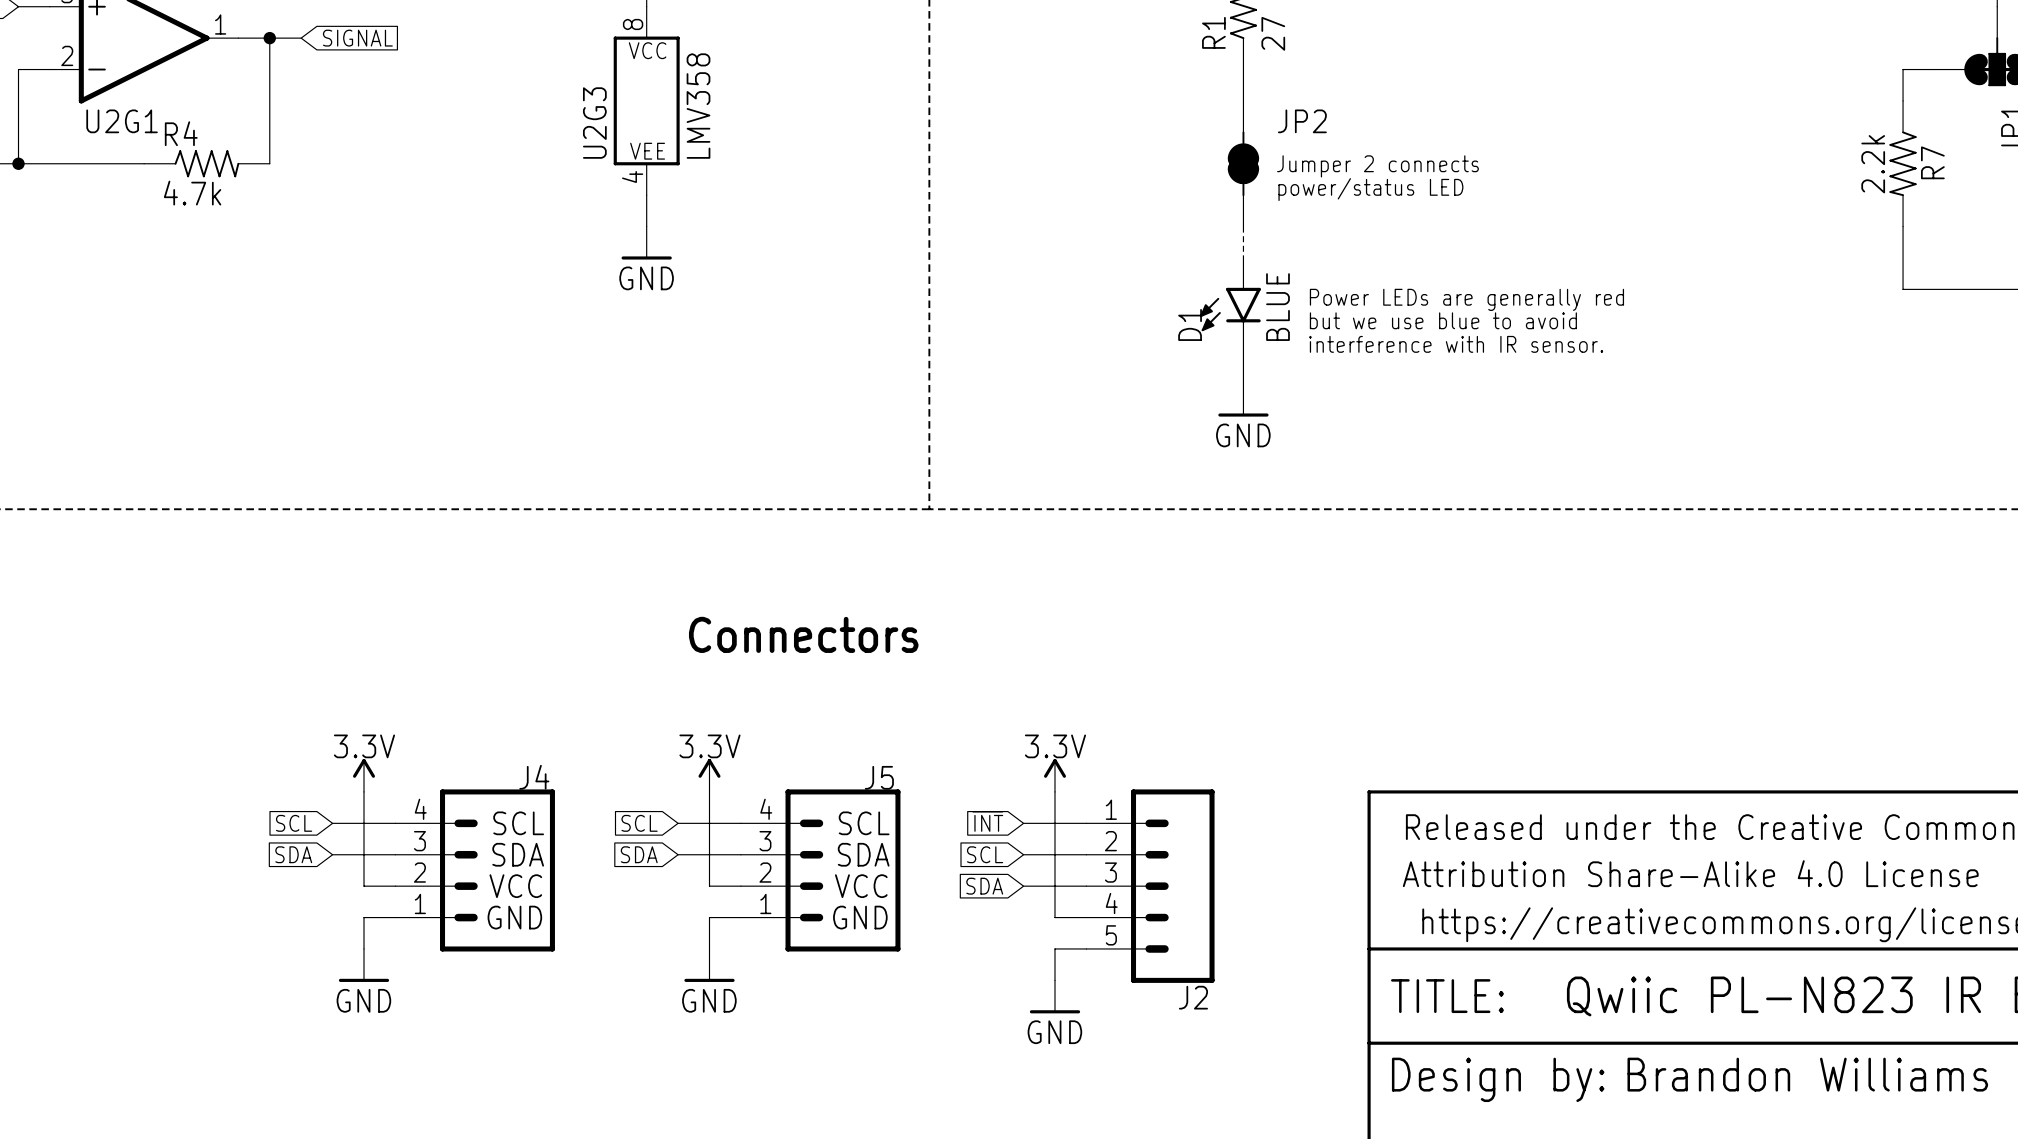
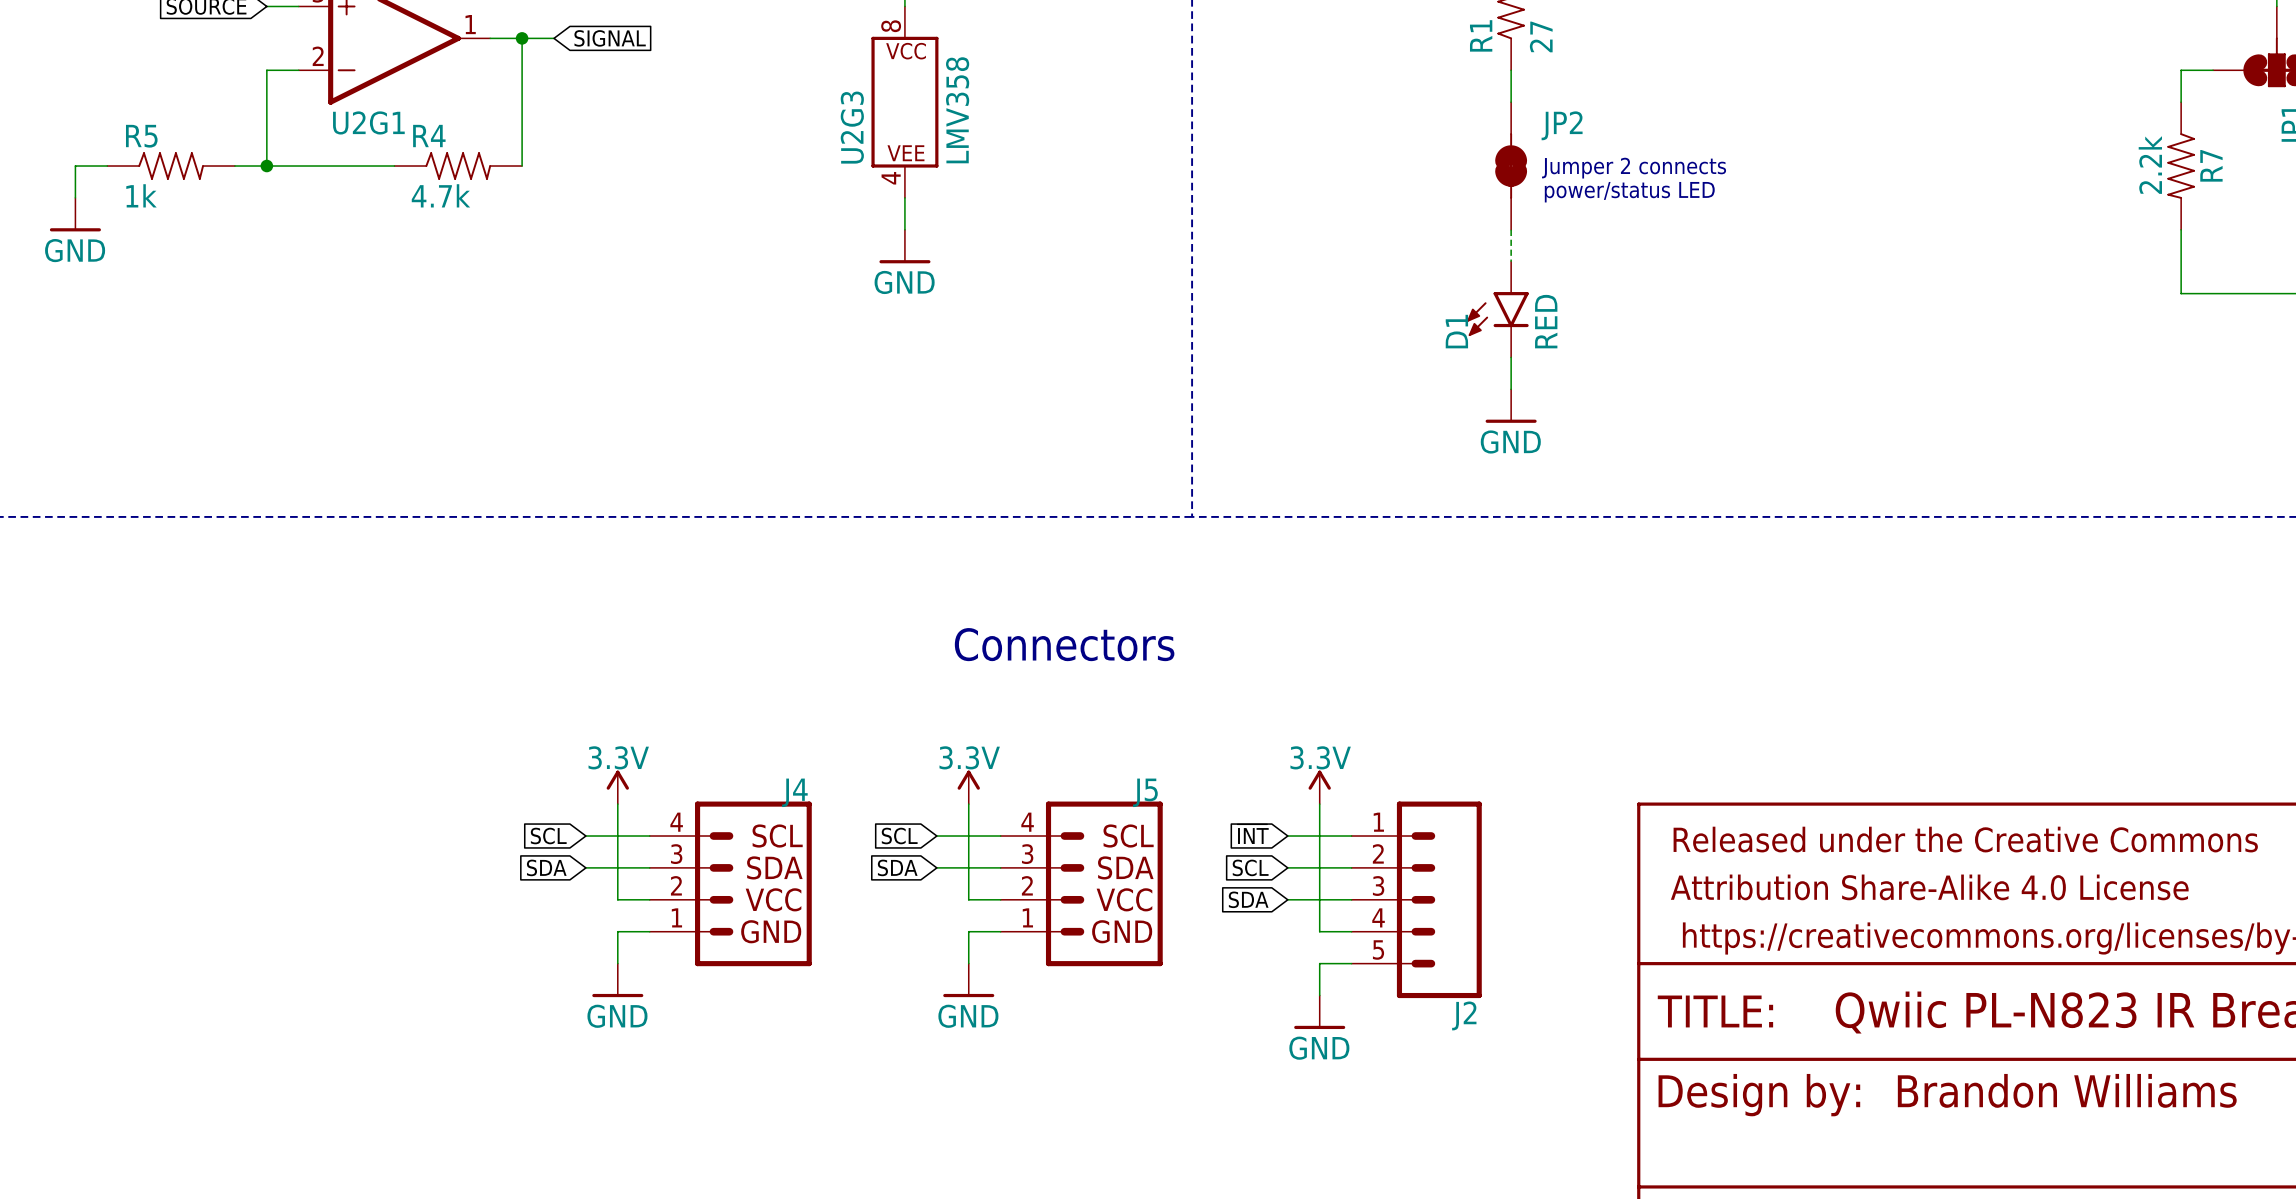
text: Power LEDs are generally red (1466, 299) -> none
D1 value: BLUE (1277, 307) -> RED (1546, 321)
text: but we use blue to avoid (1443, 320) -> none
text: interference with IR sensor. (1456, 344) -> none

